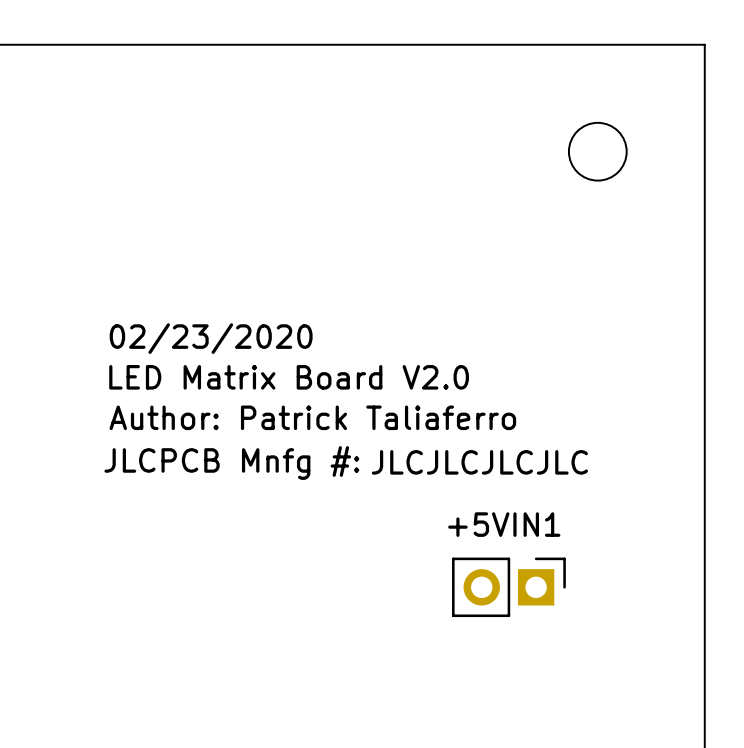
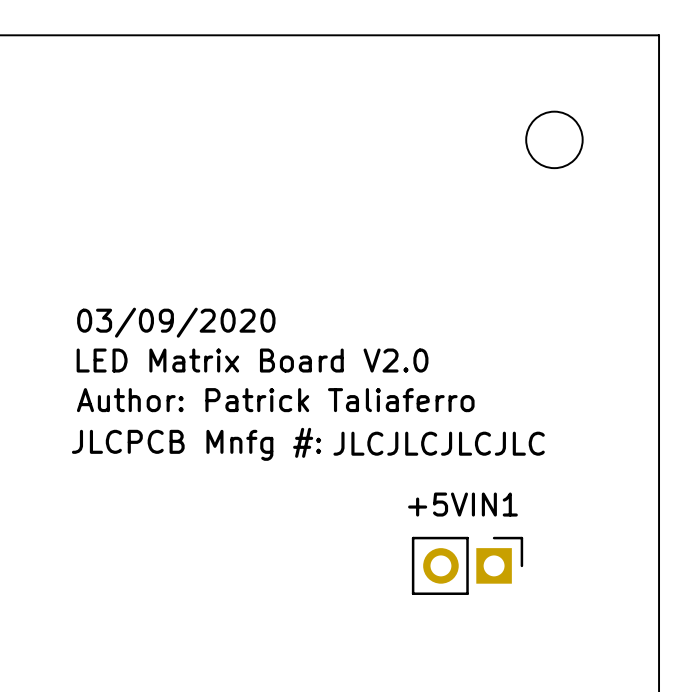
text: 02/23/2020 (211, 338) -> 03/09/2020 (176, 322)

